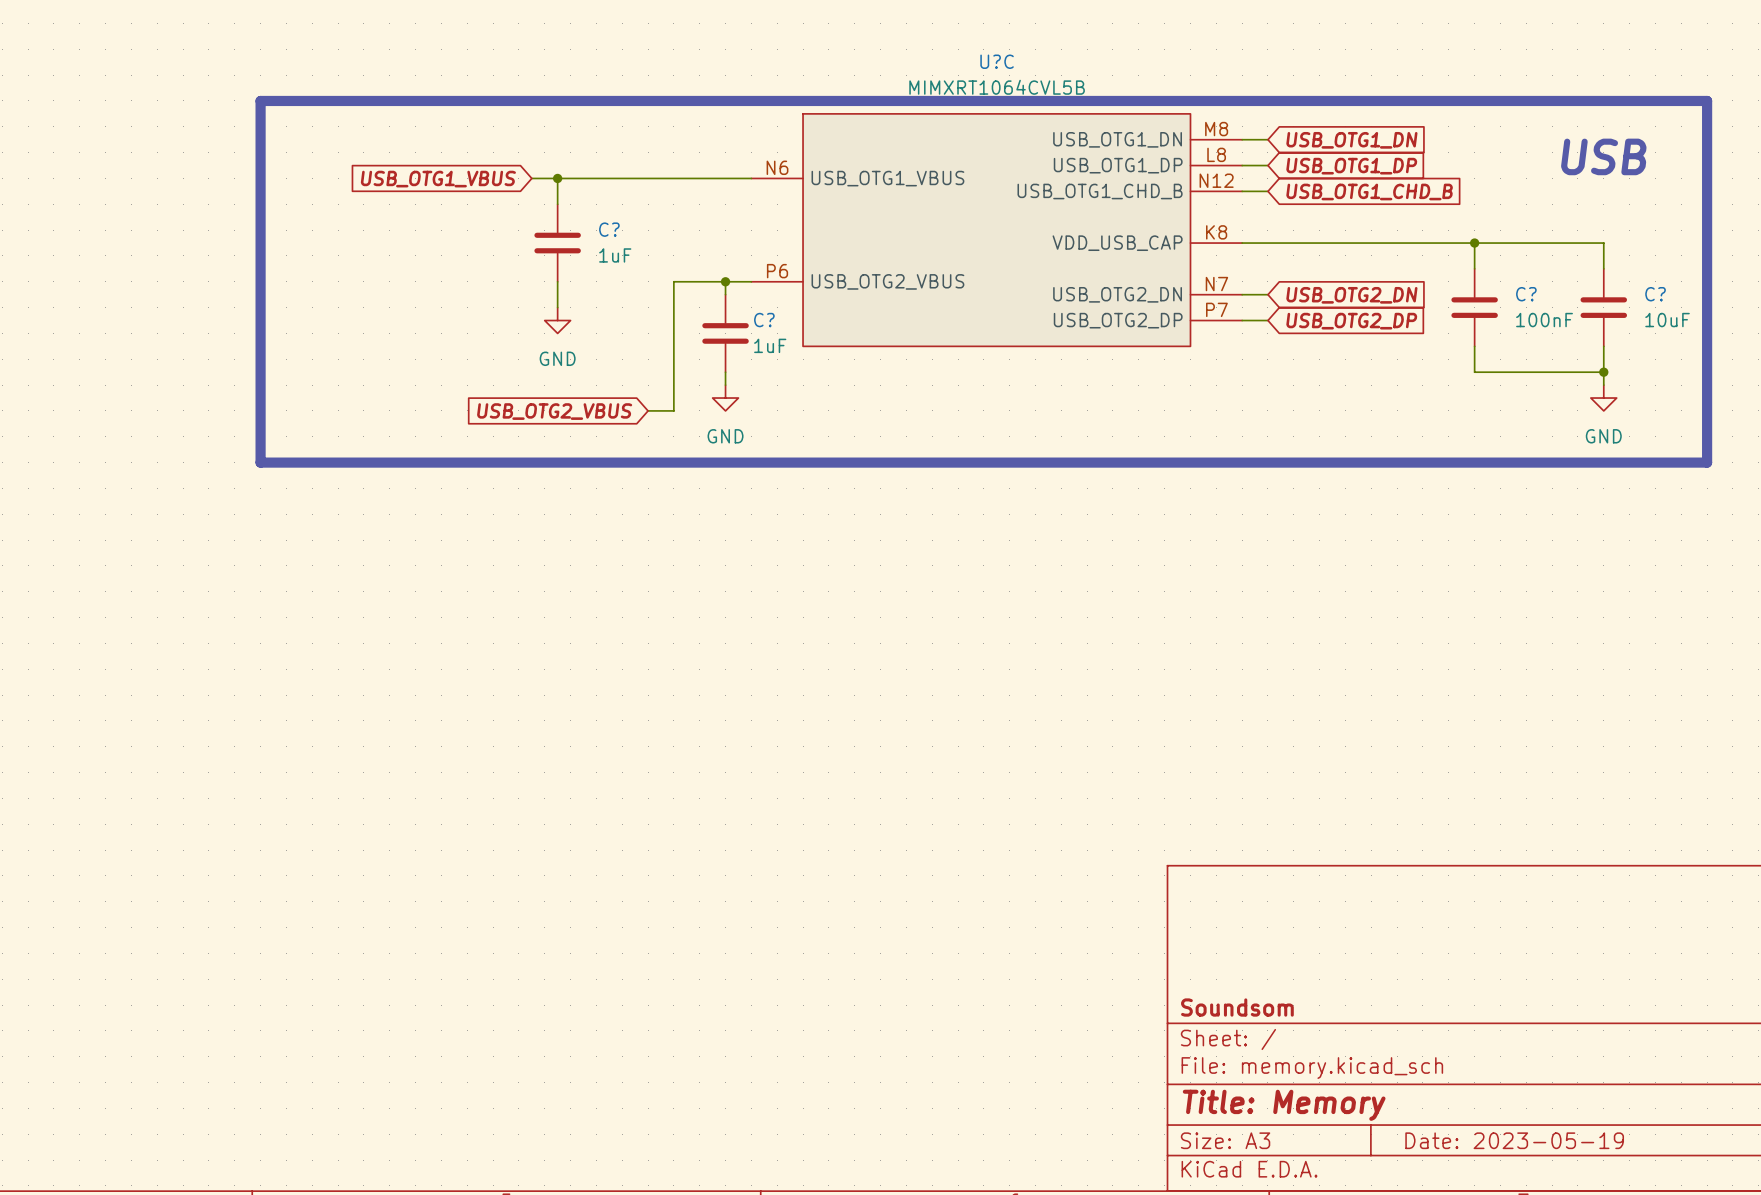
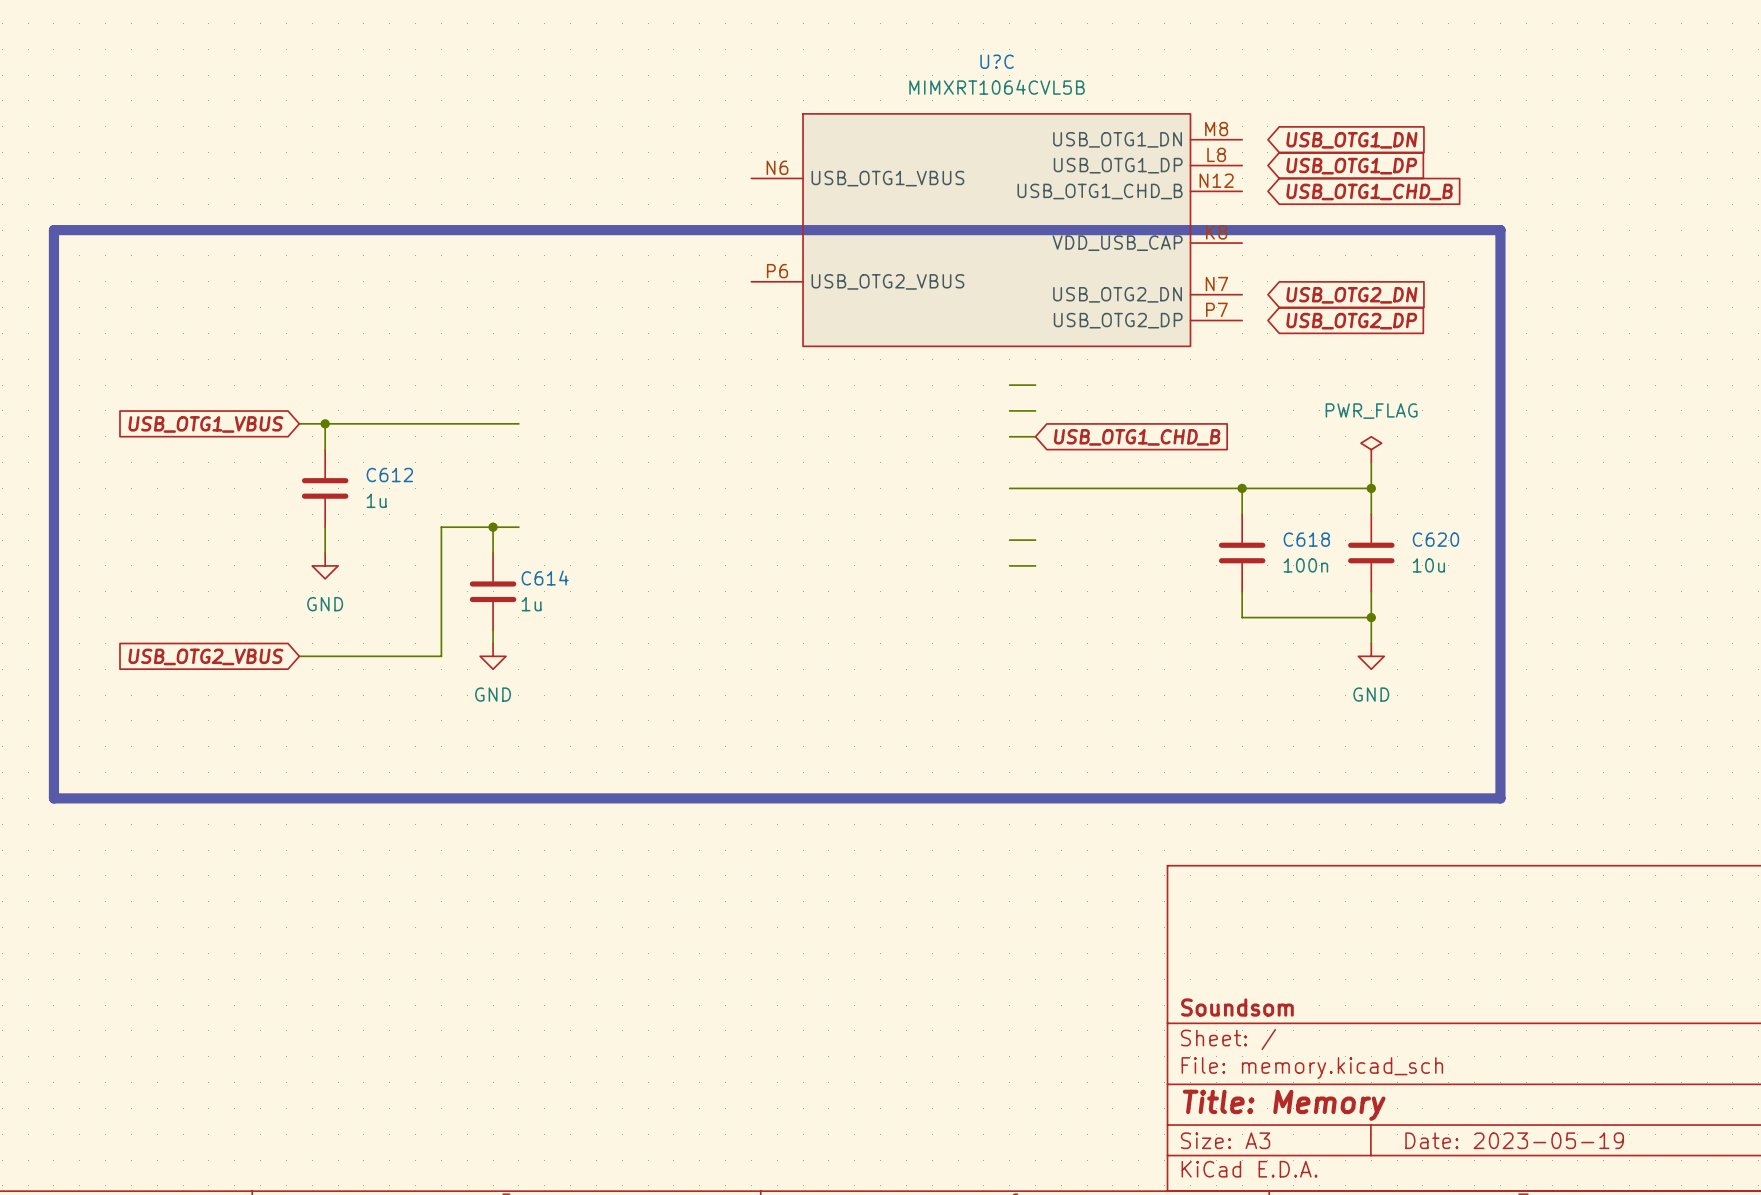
line: (260, 100) (1707, 100) (1707, 462) (260, 462) (260, 100) -> none
wire: (1242, 139) (1267, 139) -> none
text: USB (1603, 156) -> none
wire: (1242, 165) (1267, 165) -> none
wire: (531, 178) (751, 178) -> none
wire: (557, 178) (557, 204) -> none
junction: (557, 178) -> none
global label: USB_OTG1_VBUS (438, 179) -> none
wire: (1242, 191) (1267, 191) -> none
line: none -> (53, 230) (1500, 230) (1500, 798) (53, 798) (53, 230)
C?: 1uF (557, 243) -> none
wire: (1242, 243) (1603, 243) (1603, 268) -> none
wire: (1474, 243) (1474, 268) -> none
junction: (1474, 243) -> none
wire: (557, 281) (557, 307) -> (493, 527) (493, 553)
wire: (725, 281) (725, 294) -> none
junction: (725, 281) -> none
wire: (751, 281) (673, 281) (673, 410) (648, 410) -> none
wire: (1242, 294) (1267, 294) -> (1009, 385) (1035, 385)
C?: 100nF (1474, 307) -> none
C?: 10uF (1603, 307) -> none
power symbol: GND (557, 320) -> none
wire: (1242, 320) (1267, 320) -> (1009, 410) (1035, 410)
C?: 1uF (725, 333) -> none
wire: (1474, 346) (1474, 372) (1603, 372) -> none
wire: (1603, 346) (1603, 385) -> none
wire: (725, 372) (725, 385) -> none
junction: (1603, 372) -> none
power symbol: GND (725, 398) -> none
power symbol: GND (1603, 398) -> none
global label: USB_OTG2_VBUS (554, 411) -> none
wire: none -> (299, 423) (518, 423)
wire: none -> (325, 423) (325, 449)
junction: none -> (325, 423)
global label: none -> USB_OTG1_VBUS (205, 424)
wire: none -> (1009, 436) (1035, 436)
global label: none -> USB_OTG1_CHD_B (1137, 437)
power symbol: none -> PWR_FLAG (1371, 449)
wire: none -> (1371, 462) (1371, 514)
C612: none -> 1u (325, 488)
wire: none -> (1009, 488) (1371, 488)
wire: none -> (1242, 488) (1242, 514)
junction: none -> (1242, 488)
junction: none -> (1371, 488)
wire: none -> (325, 527) (325, 553)
junction: none -> (493, 527)
wire: none -> (518, 527) (441, 527) (441, 656) (299, 656)
wire: none -> (1009, 540) (1035, 540)
C618: none -> 100n (1242, 553)
C620: none -> 10u (1371, 553)
power symbol: none -> GND (325, 565)
wire: none -> (1009, 565) (1035, 565)
C614: none -> 1u (493, 591)
wire: none -> (1242, 591) (1242, 617) (1371, 617)
wire: none -> (1371, 591) (1371, 643)
junction: none -> (1371, 617)
wire: none -> (493, 630) (493, 643)
global label: none -> USB_OTG2_VBUS (205, 656)
power symbol: none -> GND (493, 656)
power symbol: none -> GND (1371, 656)

